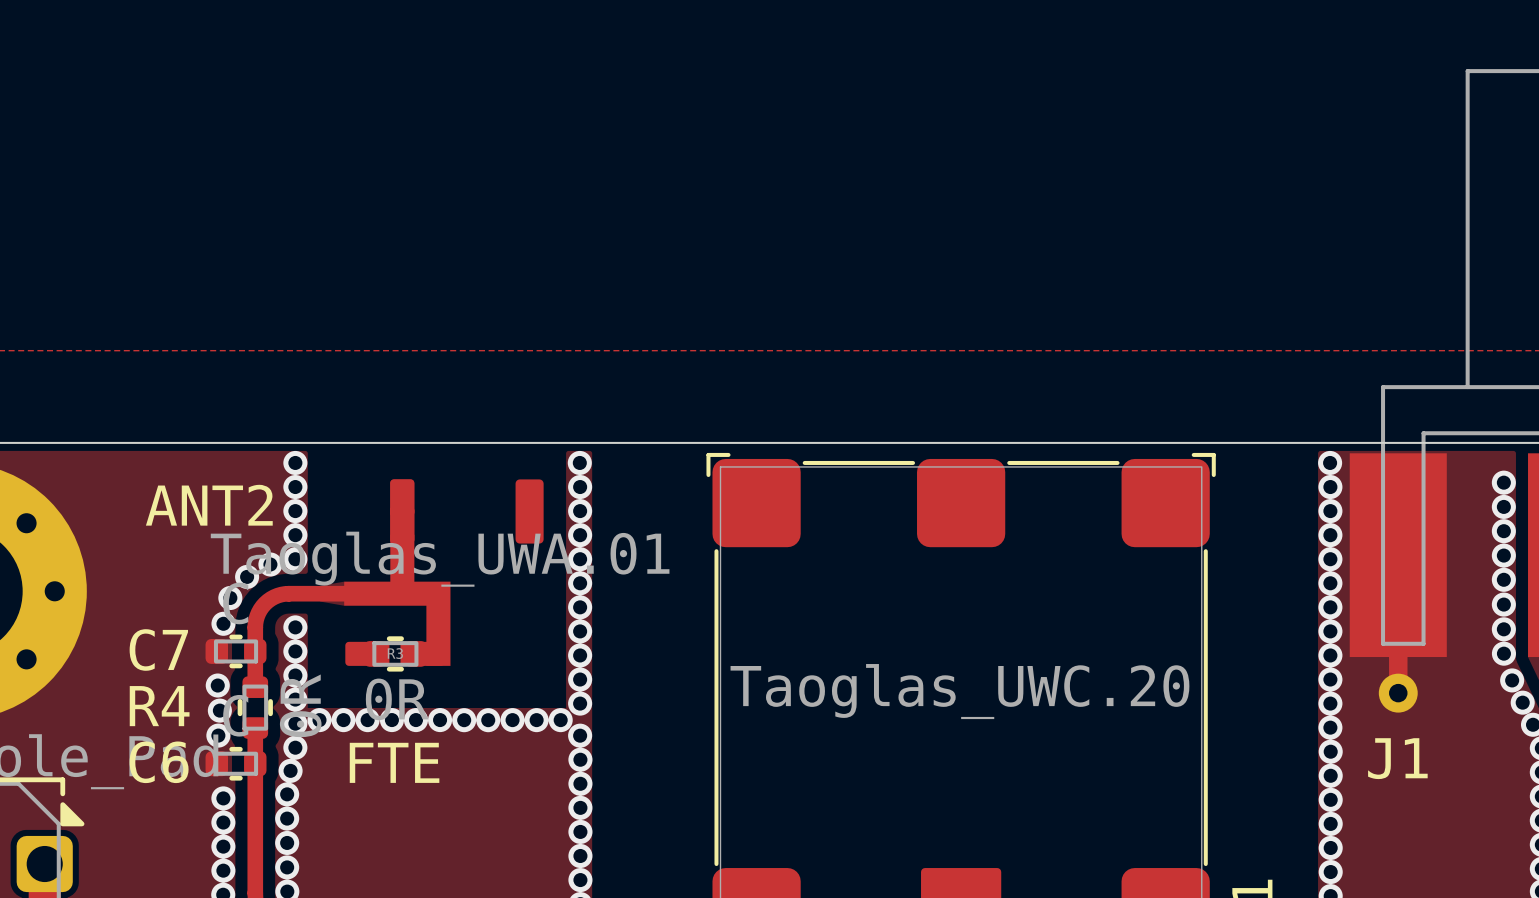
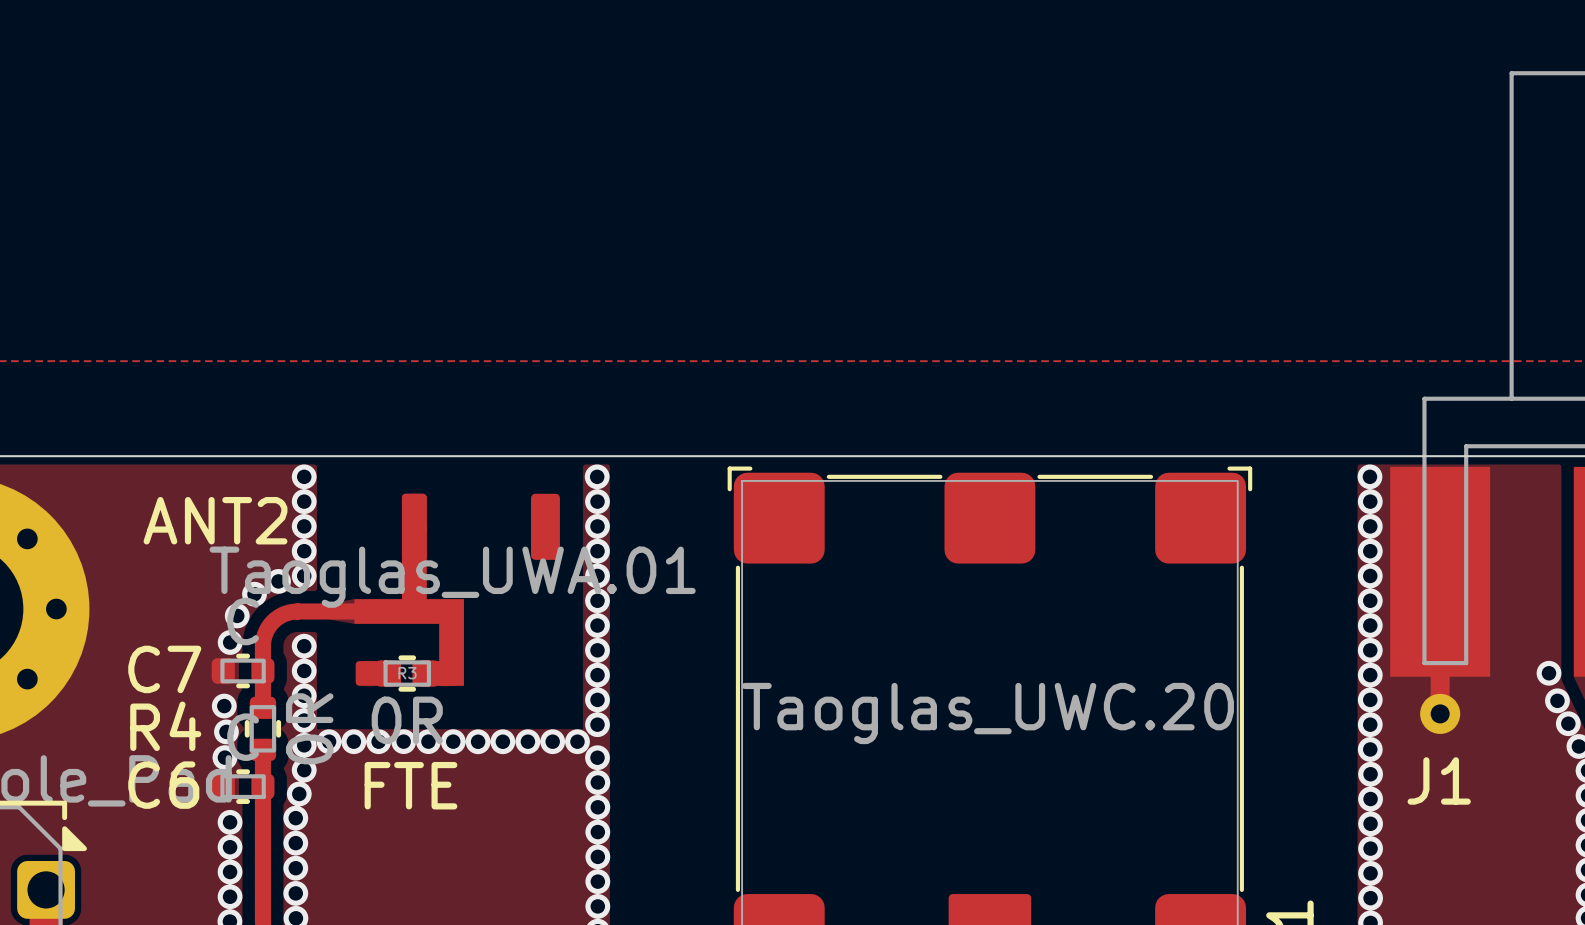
via: (1503, 482) -> none
via: (1503, 506) -> none
via: (1503, 531) -> none
via: (1503, 555) -> none
via: (1503, 579) -> none
via: (1503, 604) -> none
via: (1503, 629) -> none

